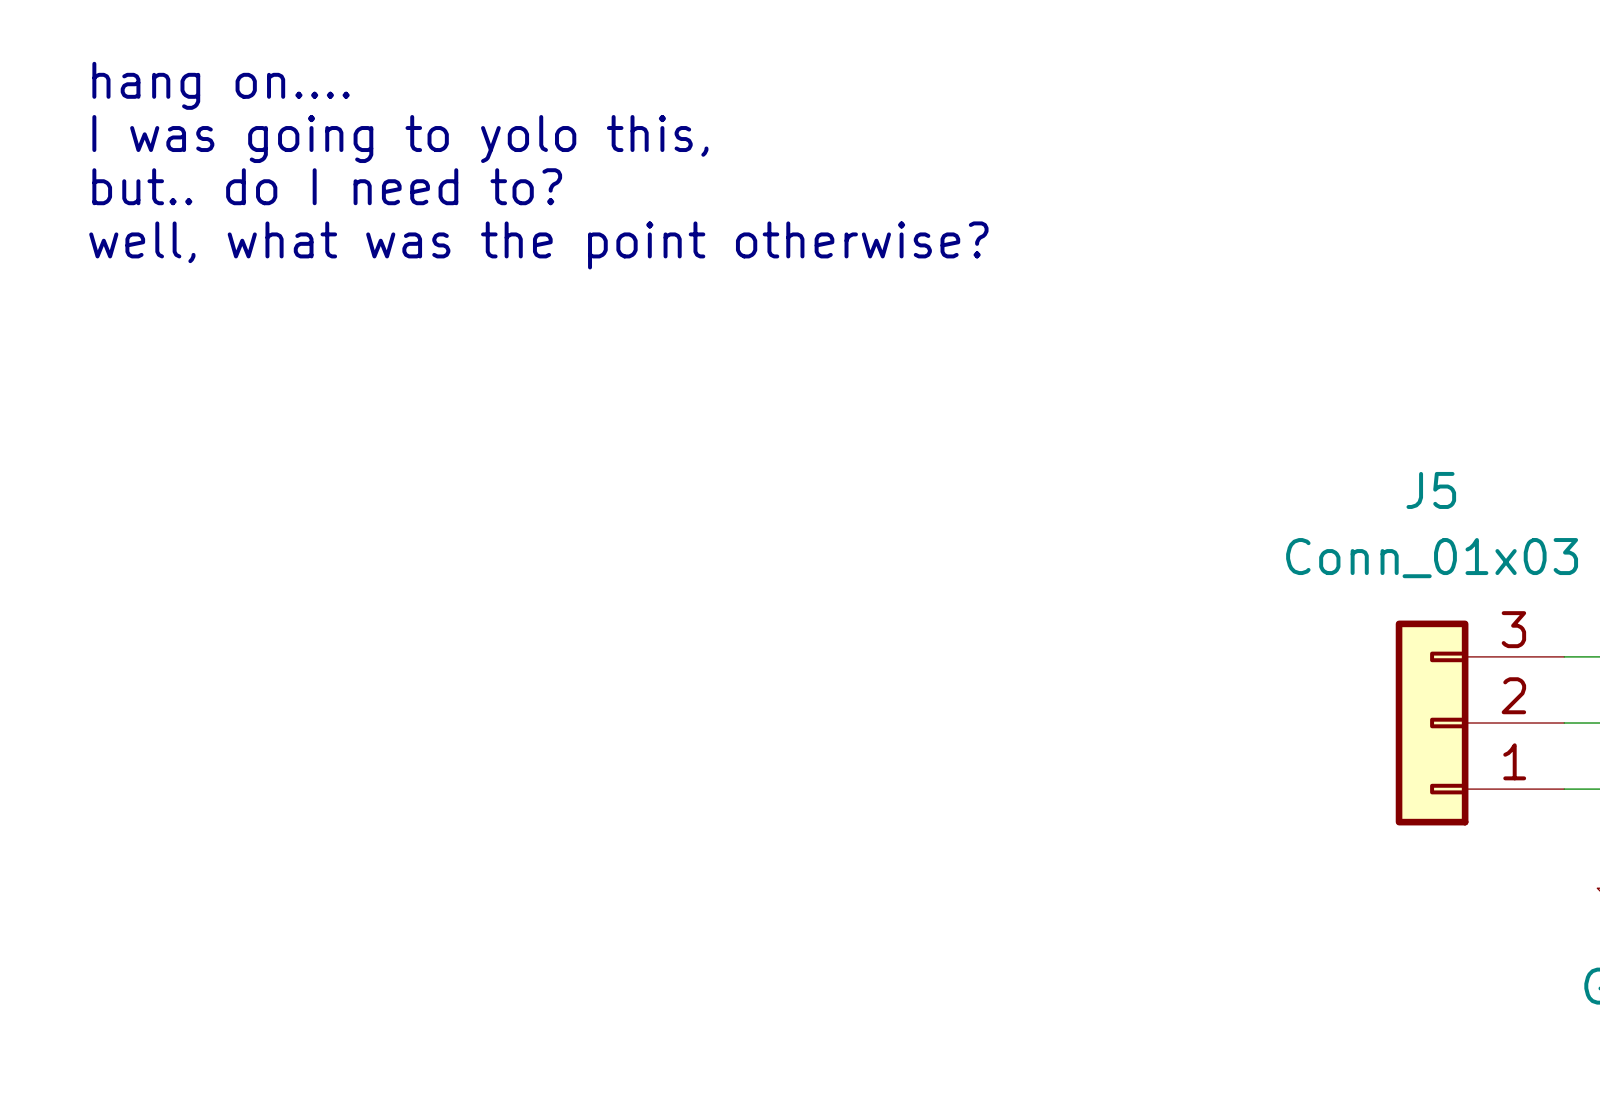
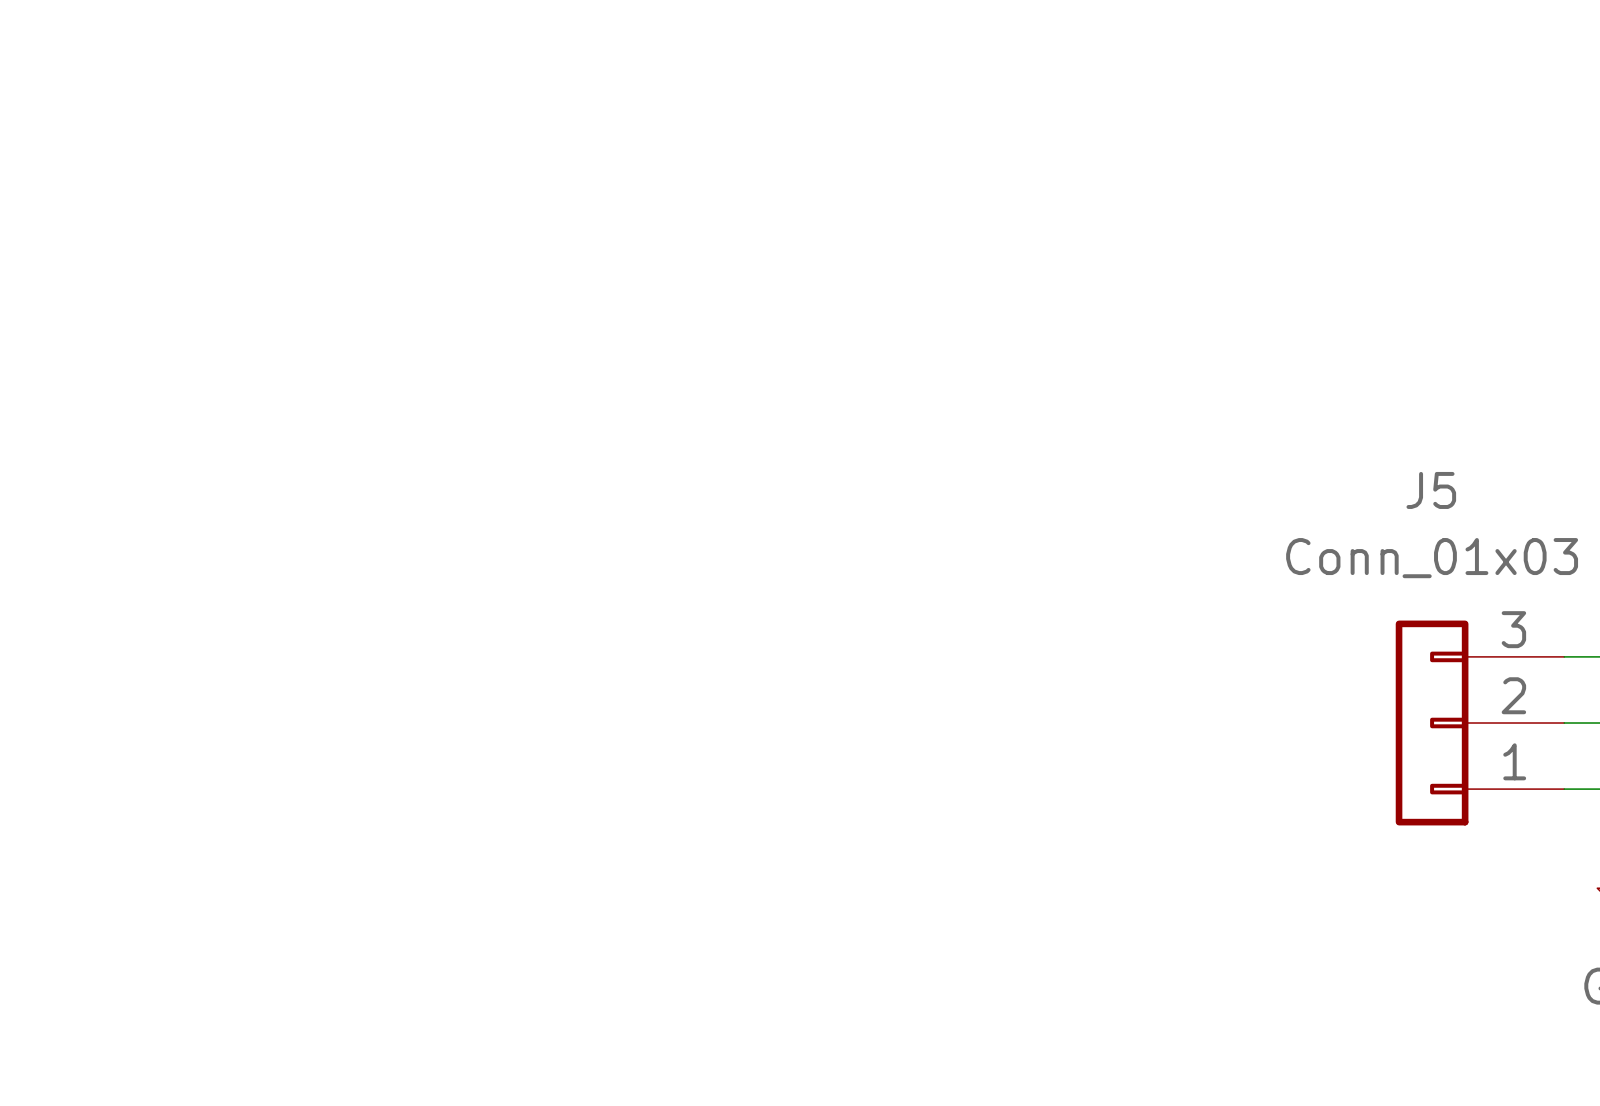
text: hang on.... (221, 85) -> none
text: I was going to yolo this, (400, 139) -> none
text: but.. do I need to? (327, 186) -> none
text: well, what was the point otherwise? (538, 245) -> none

